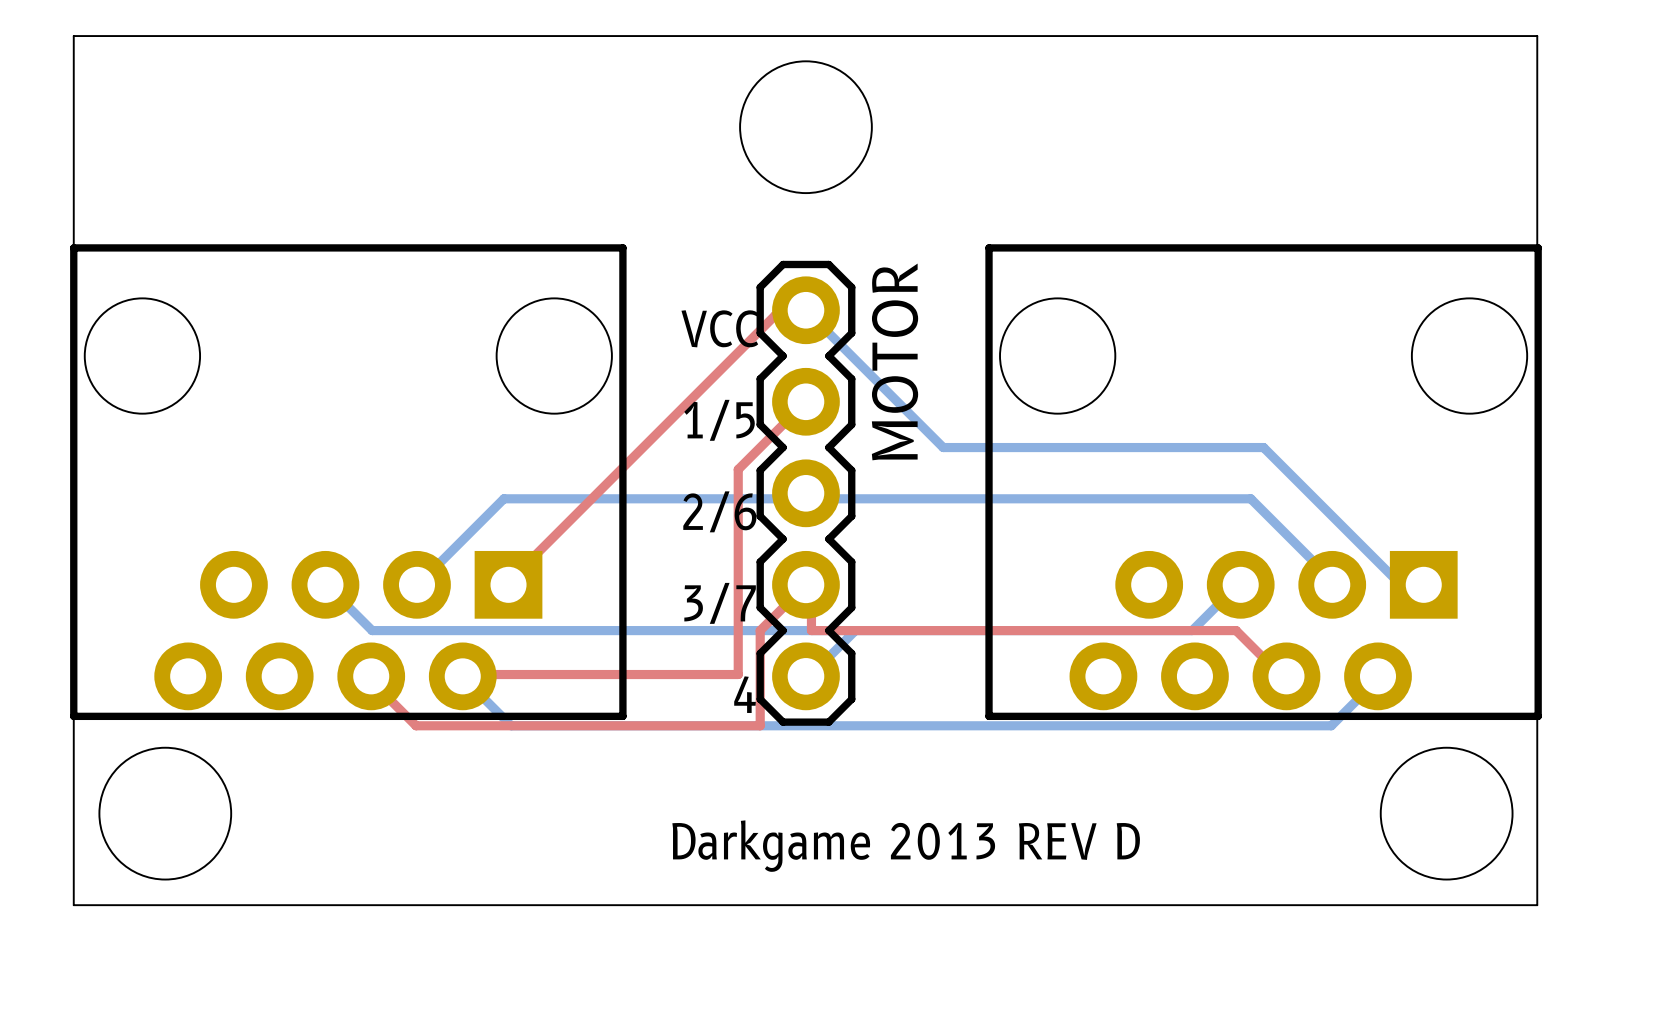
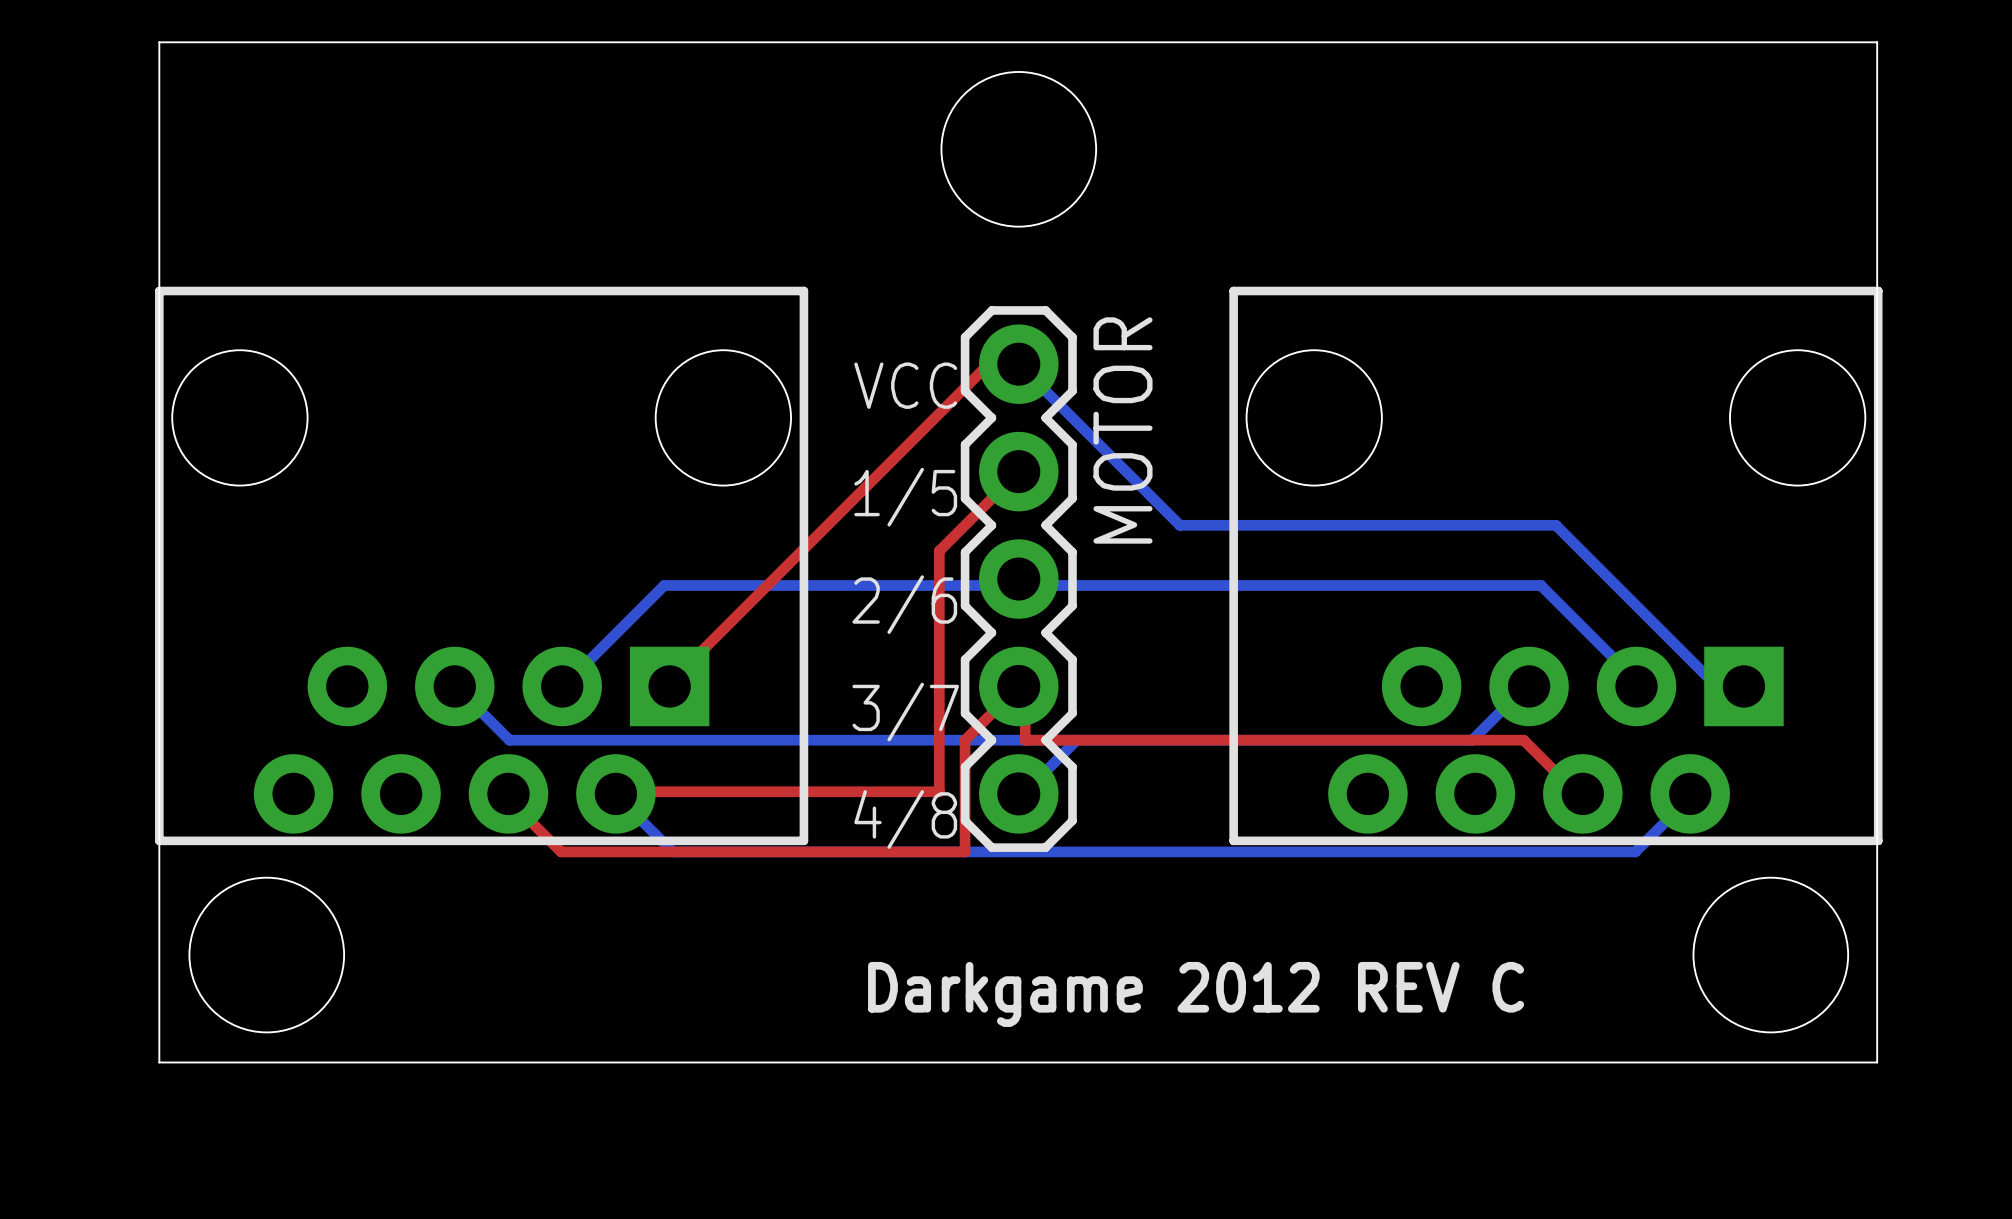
text: 4 (745, 694) -> 4/8 (905, 819)
text: Darkgame 2013 REV D (906, 846) -> Darkgame 2012 REV C (1196, 994)

